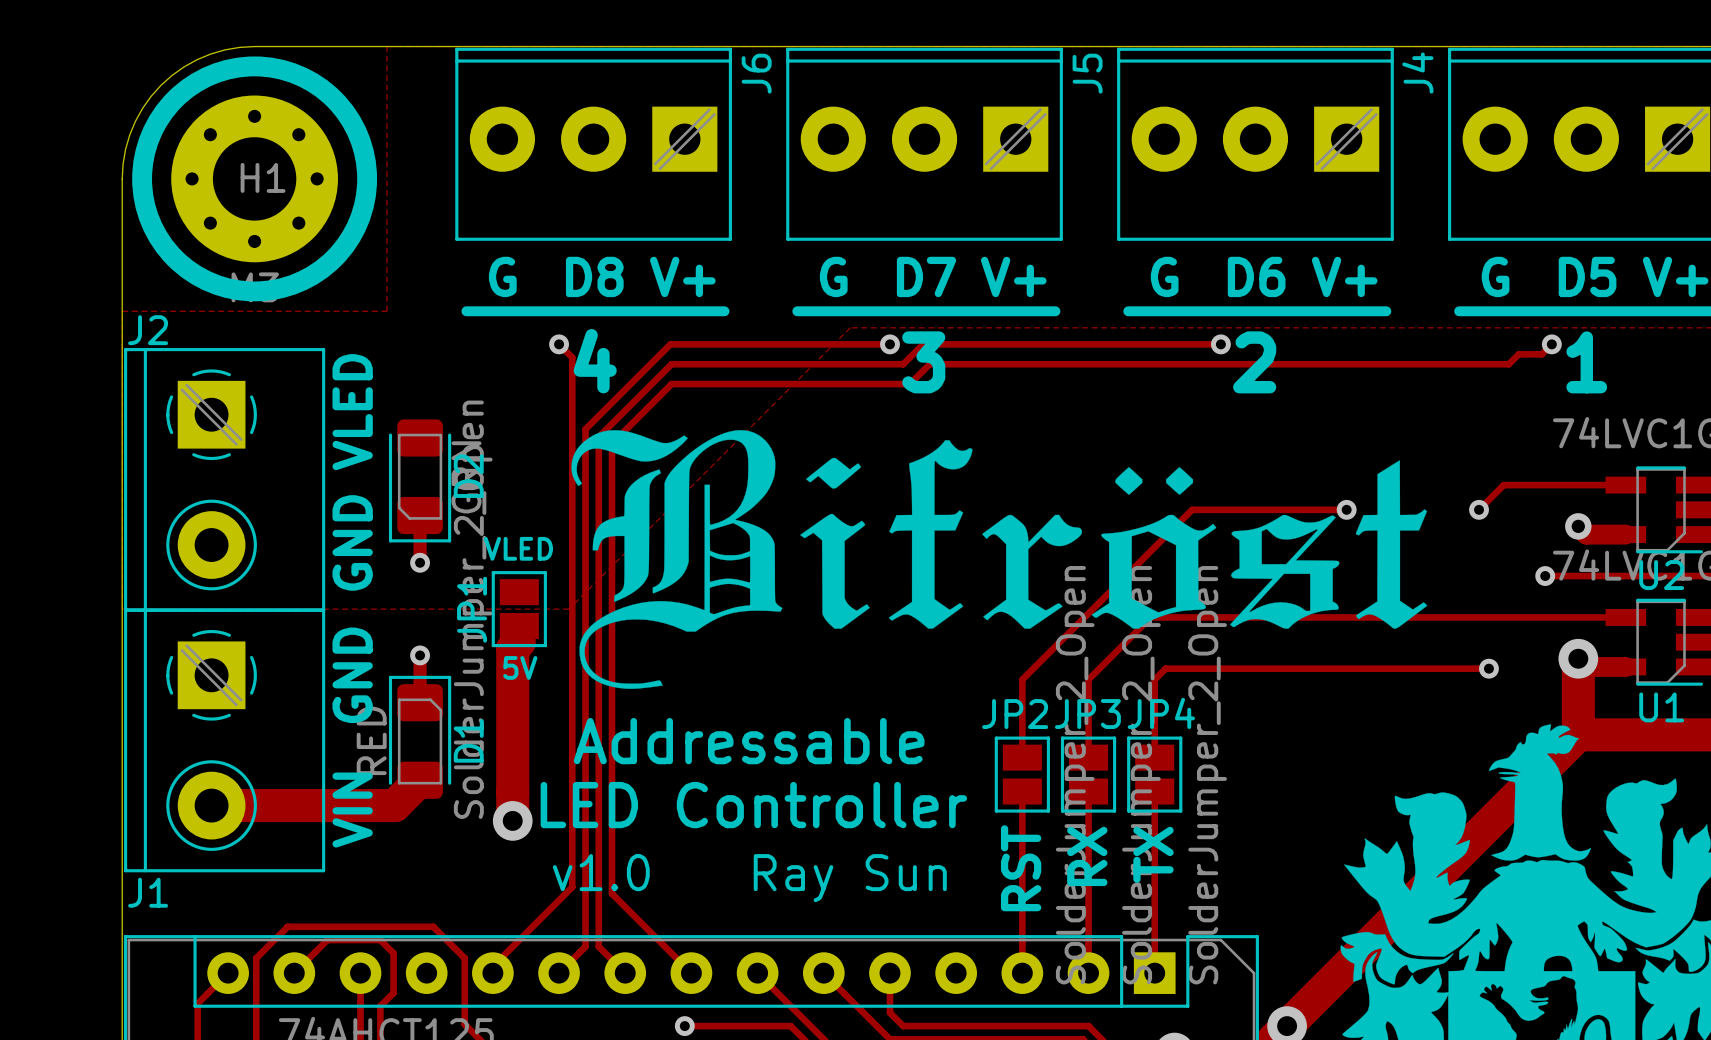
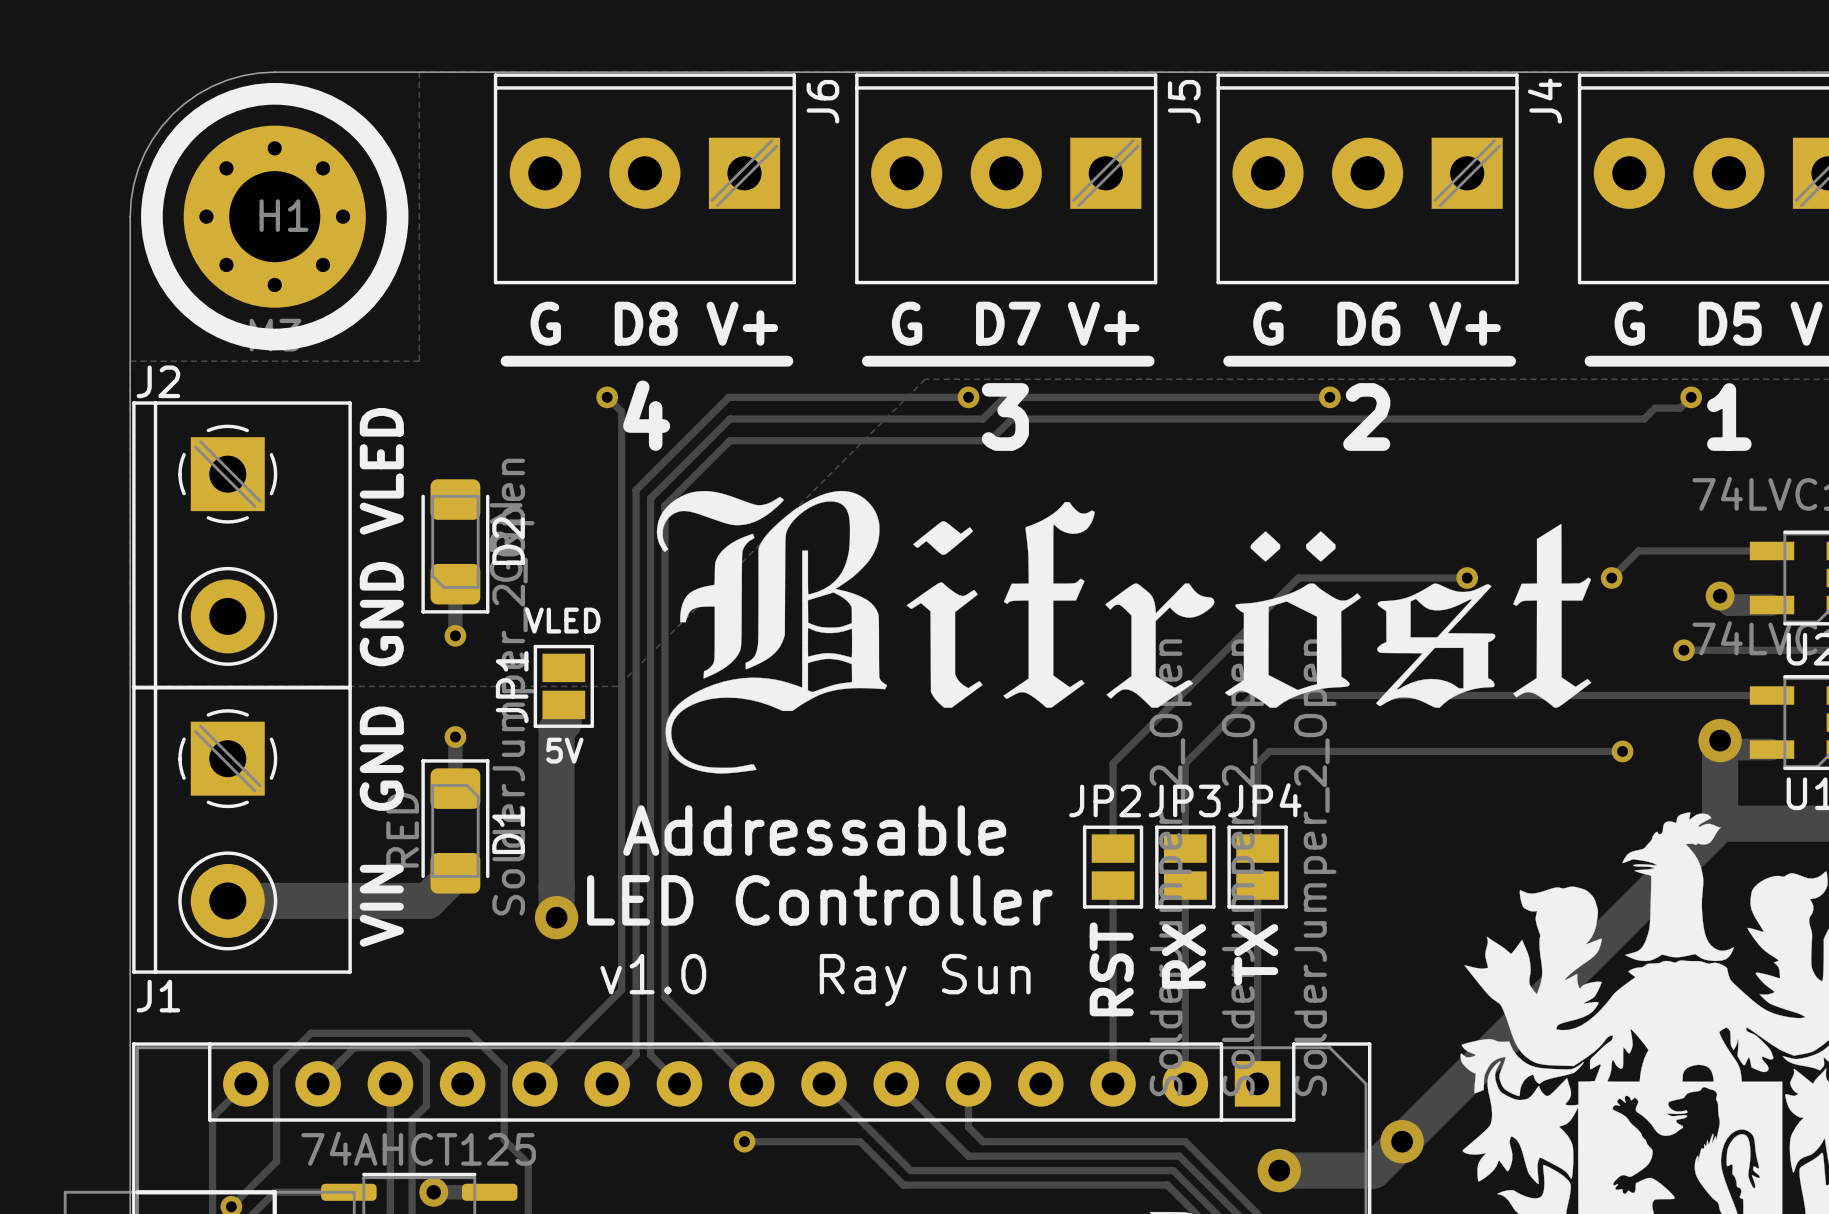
drawing position: (999, 559) -> (1124, 632)

